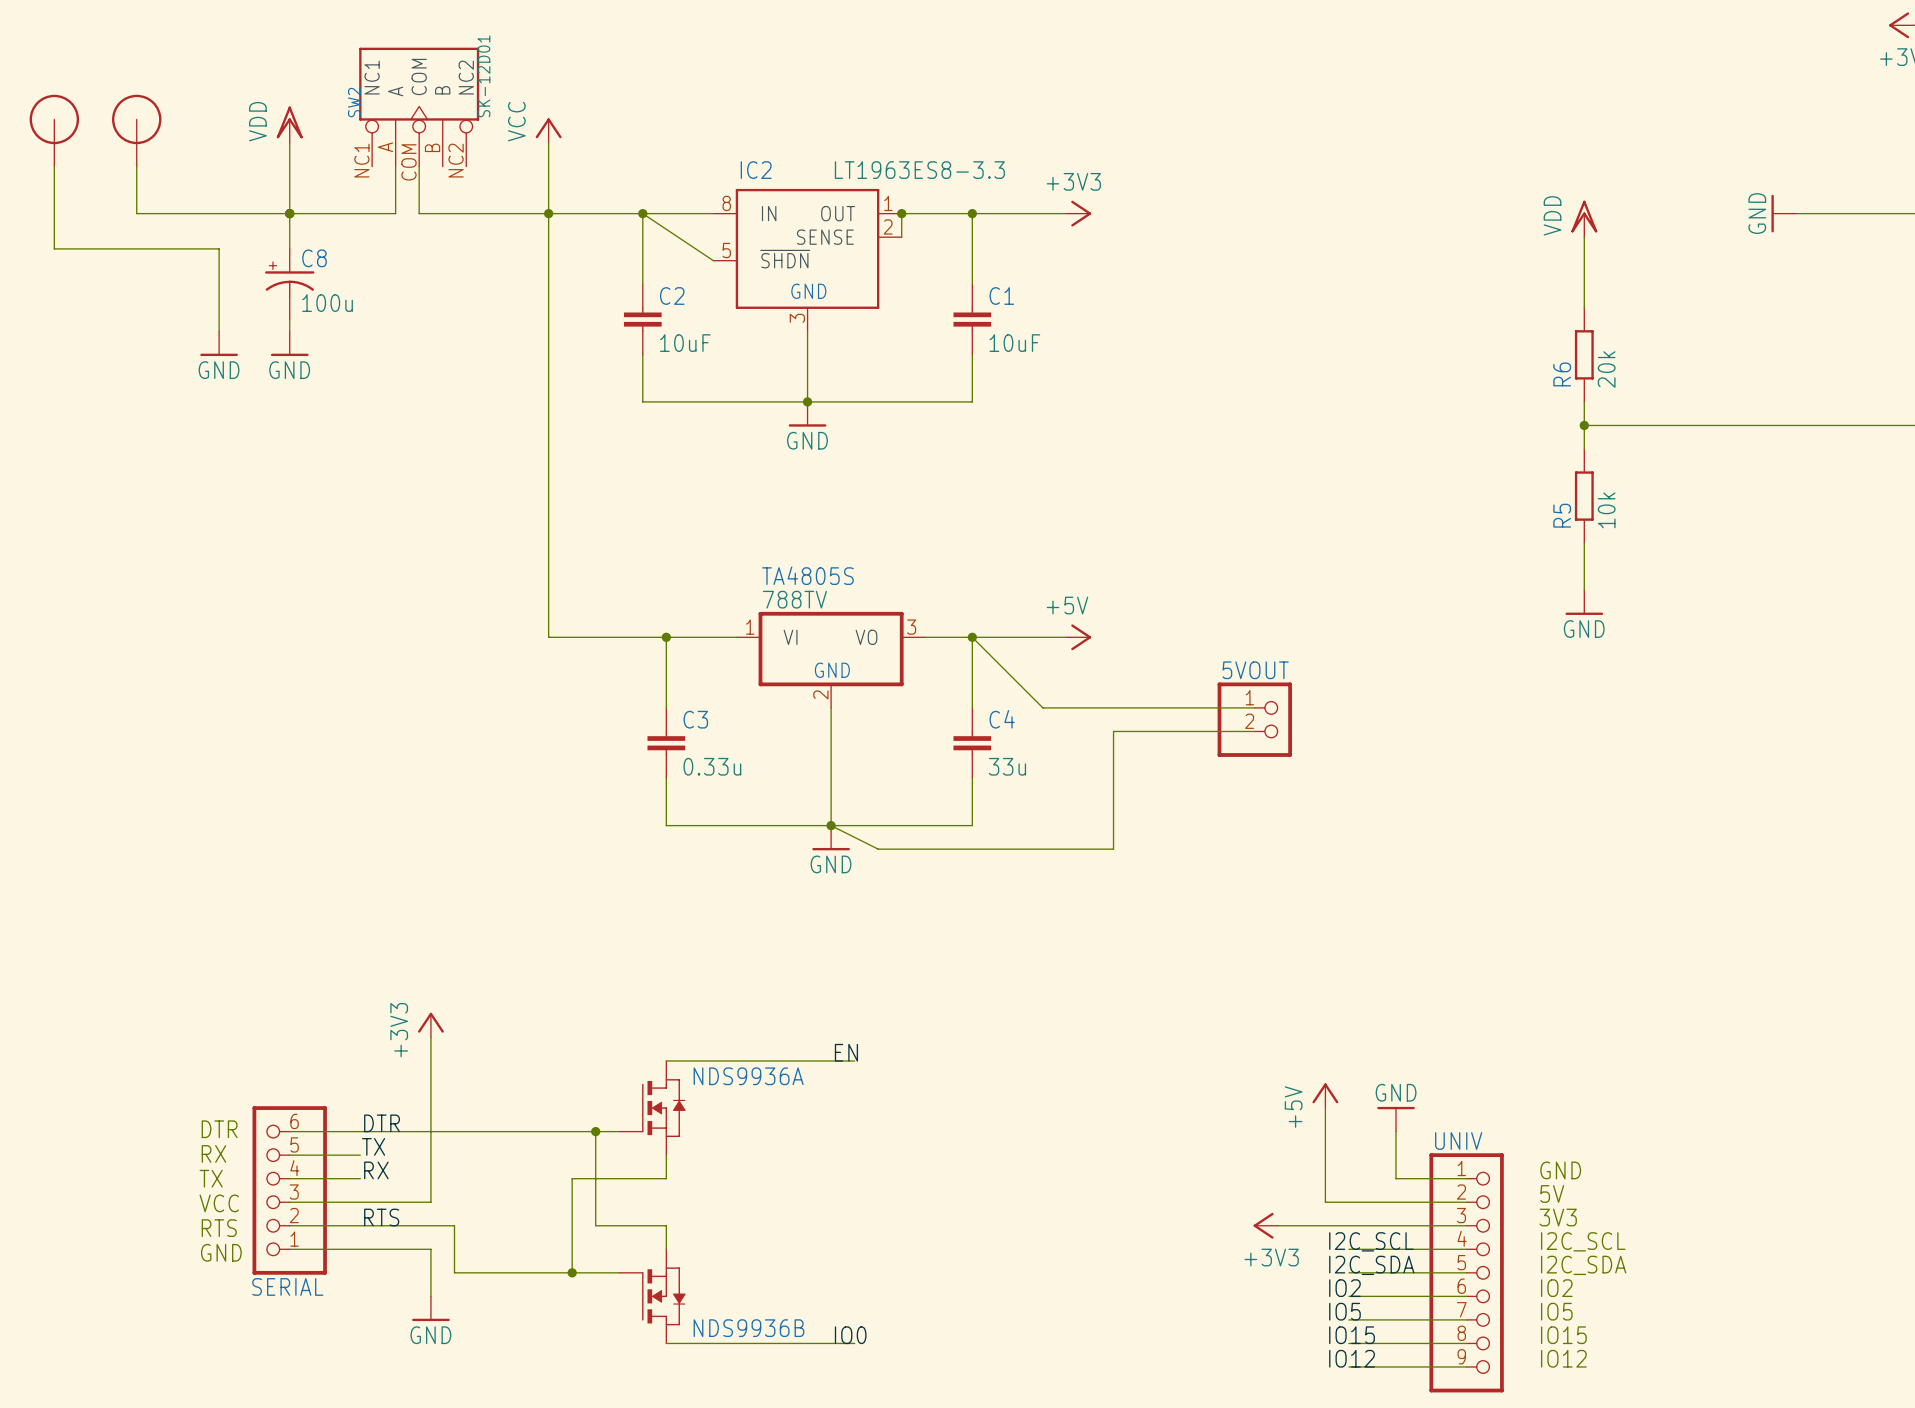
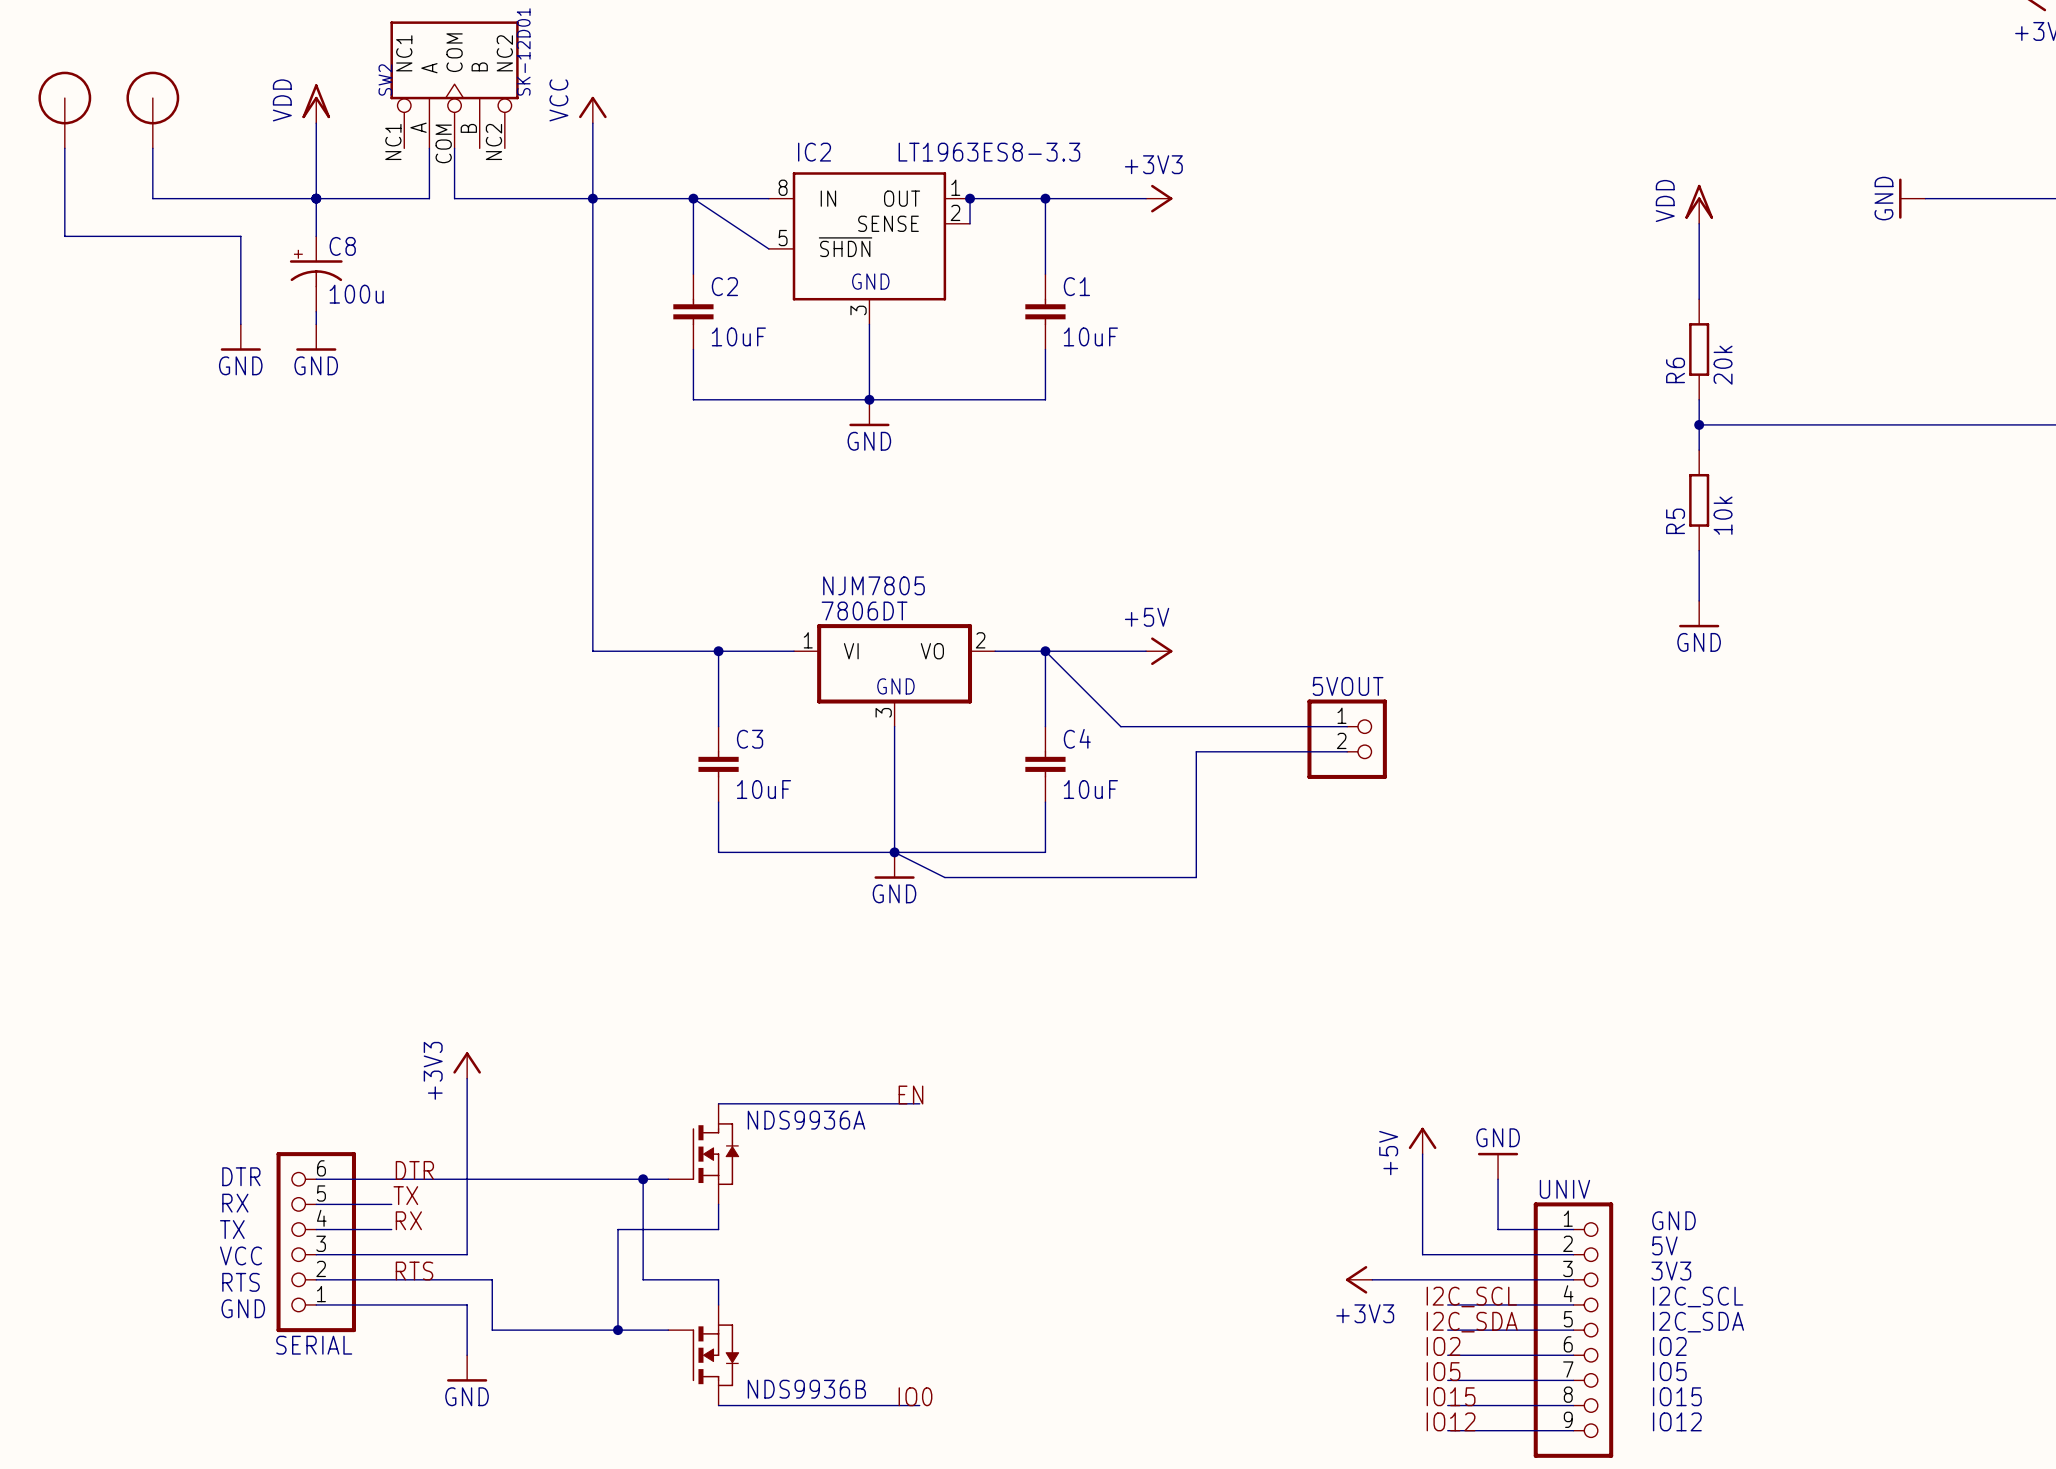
TA4805S name: TA4805S (807, 575) -> NJM7805 (874, 585)
TA4805S value: 788TV (794, 599) -> 7806DT (864, 611)
TA4805S pin number: 3 (911, 627) -> 2 (980, 640)
TA4805S pin number: 2 (820, 694) -> 3 (883, 712)
C3 value: 0.33u (712, 766) -> 10uF (764, 789)
C4 value: 33u (1007, 766) -> 10uF (1090, 789)

